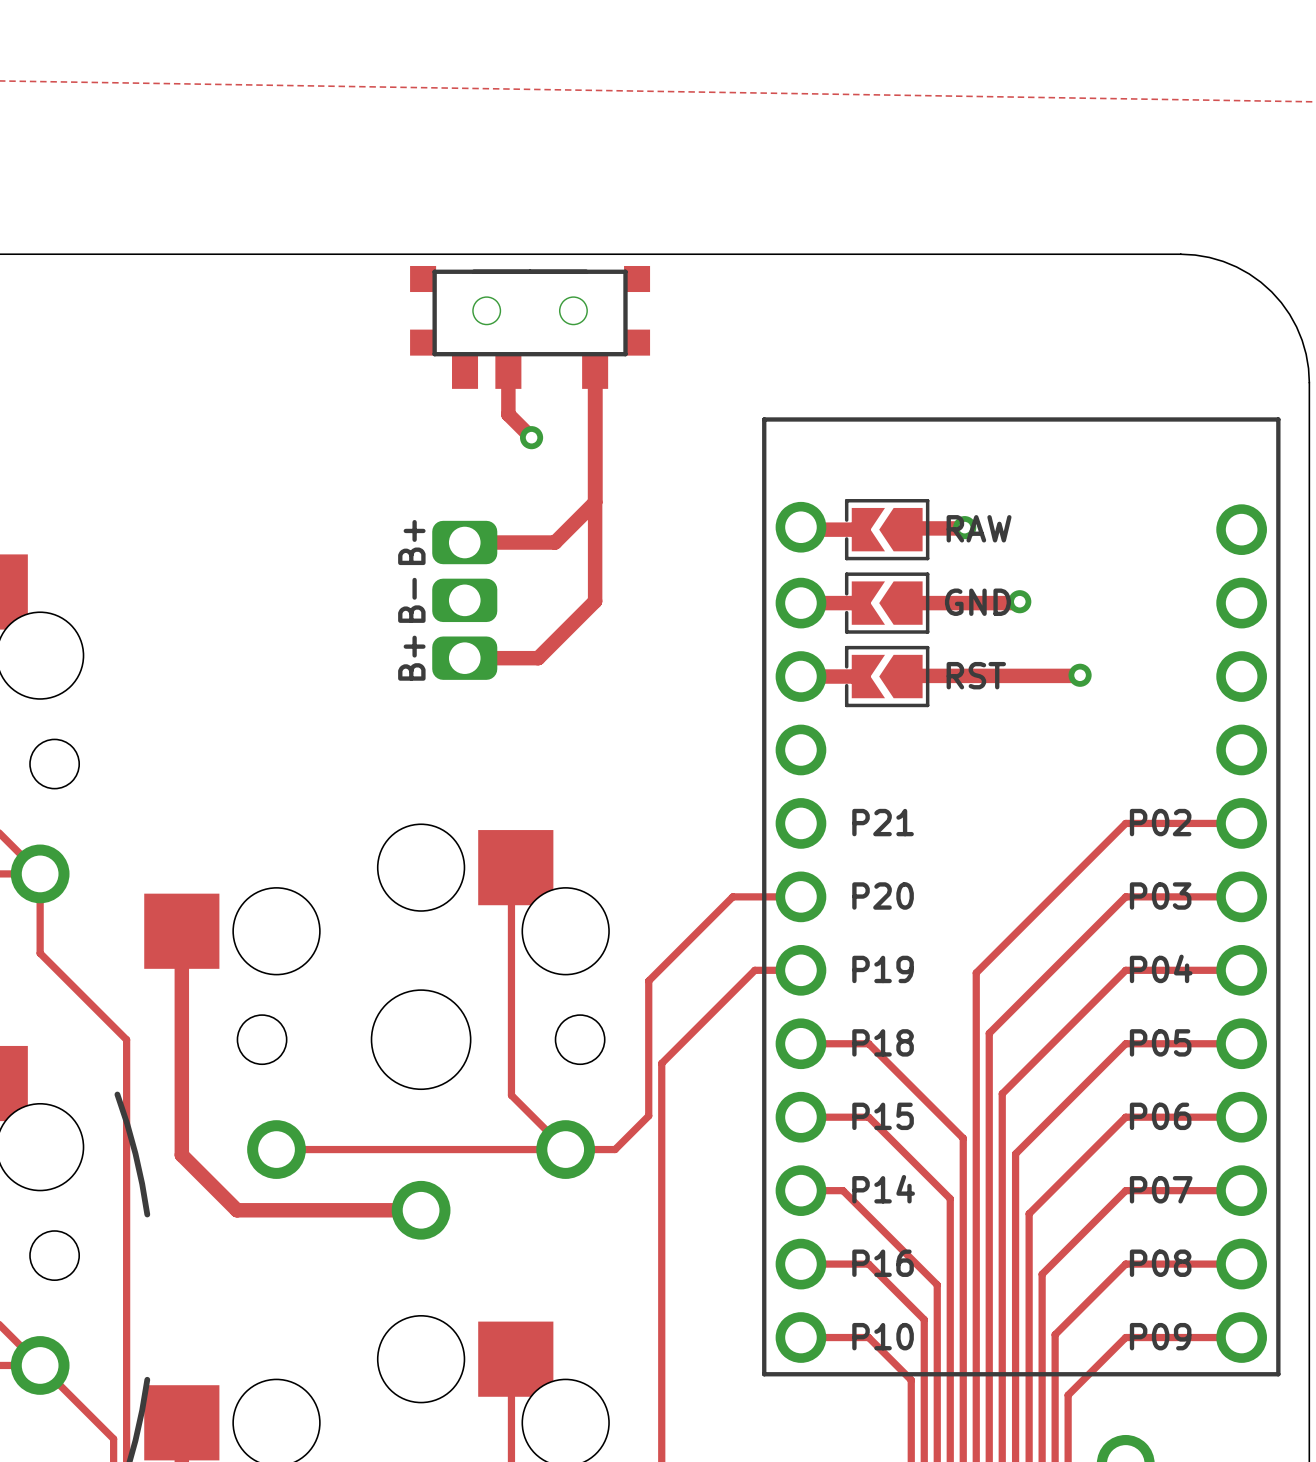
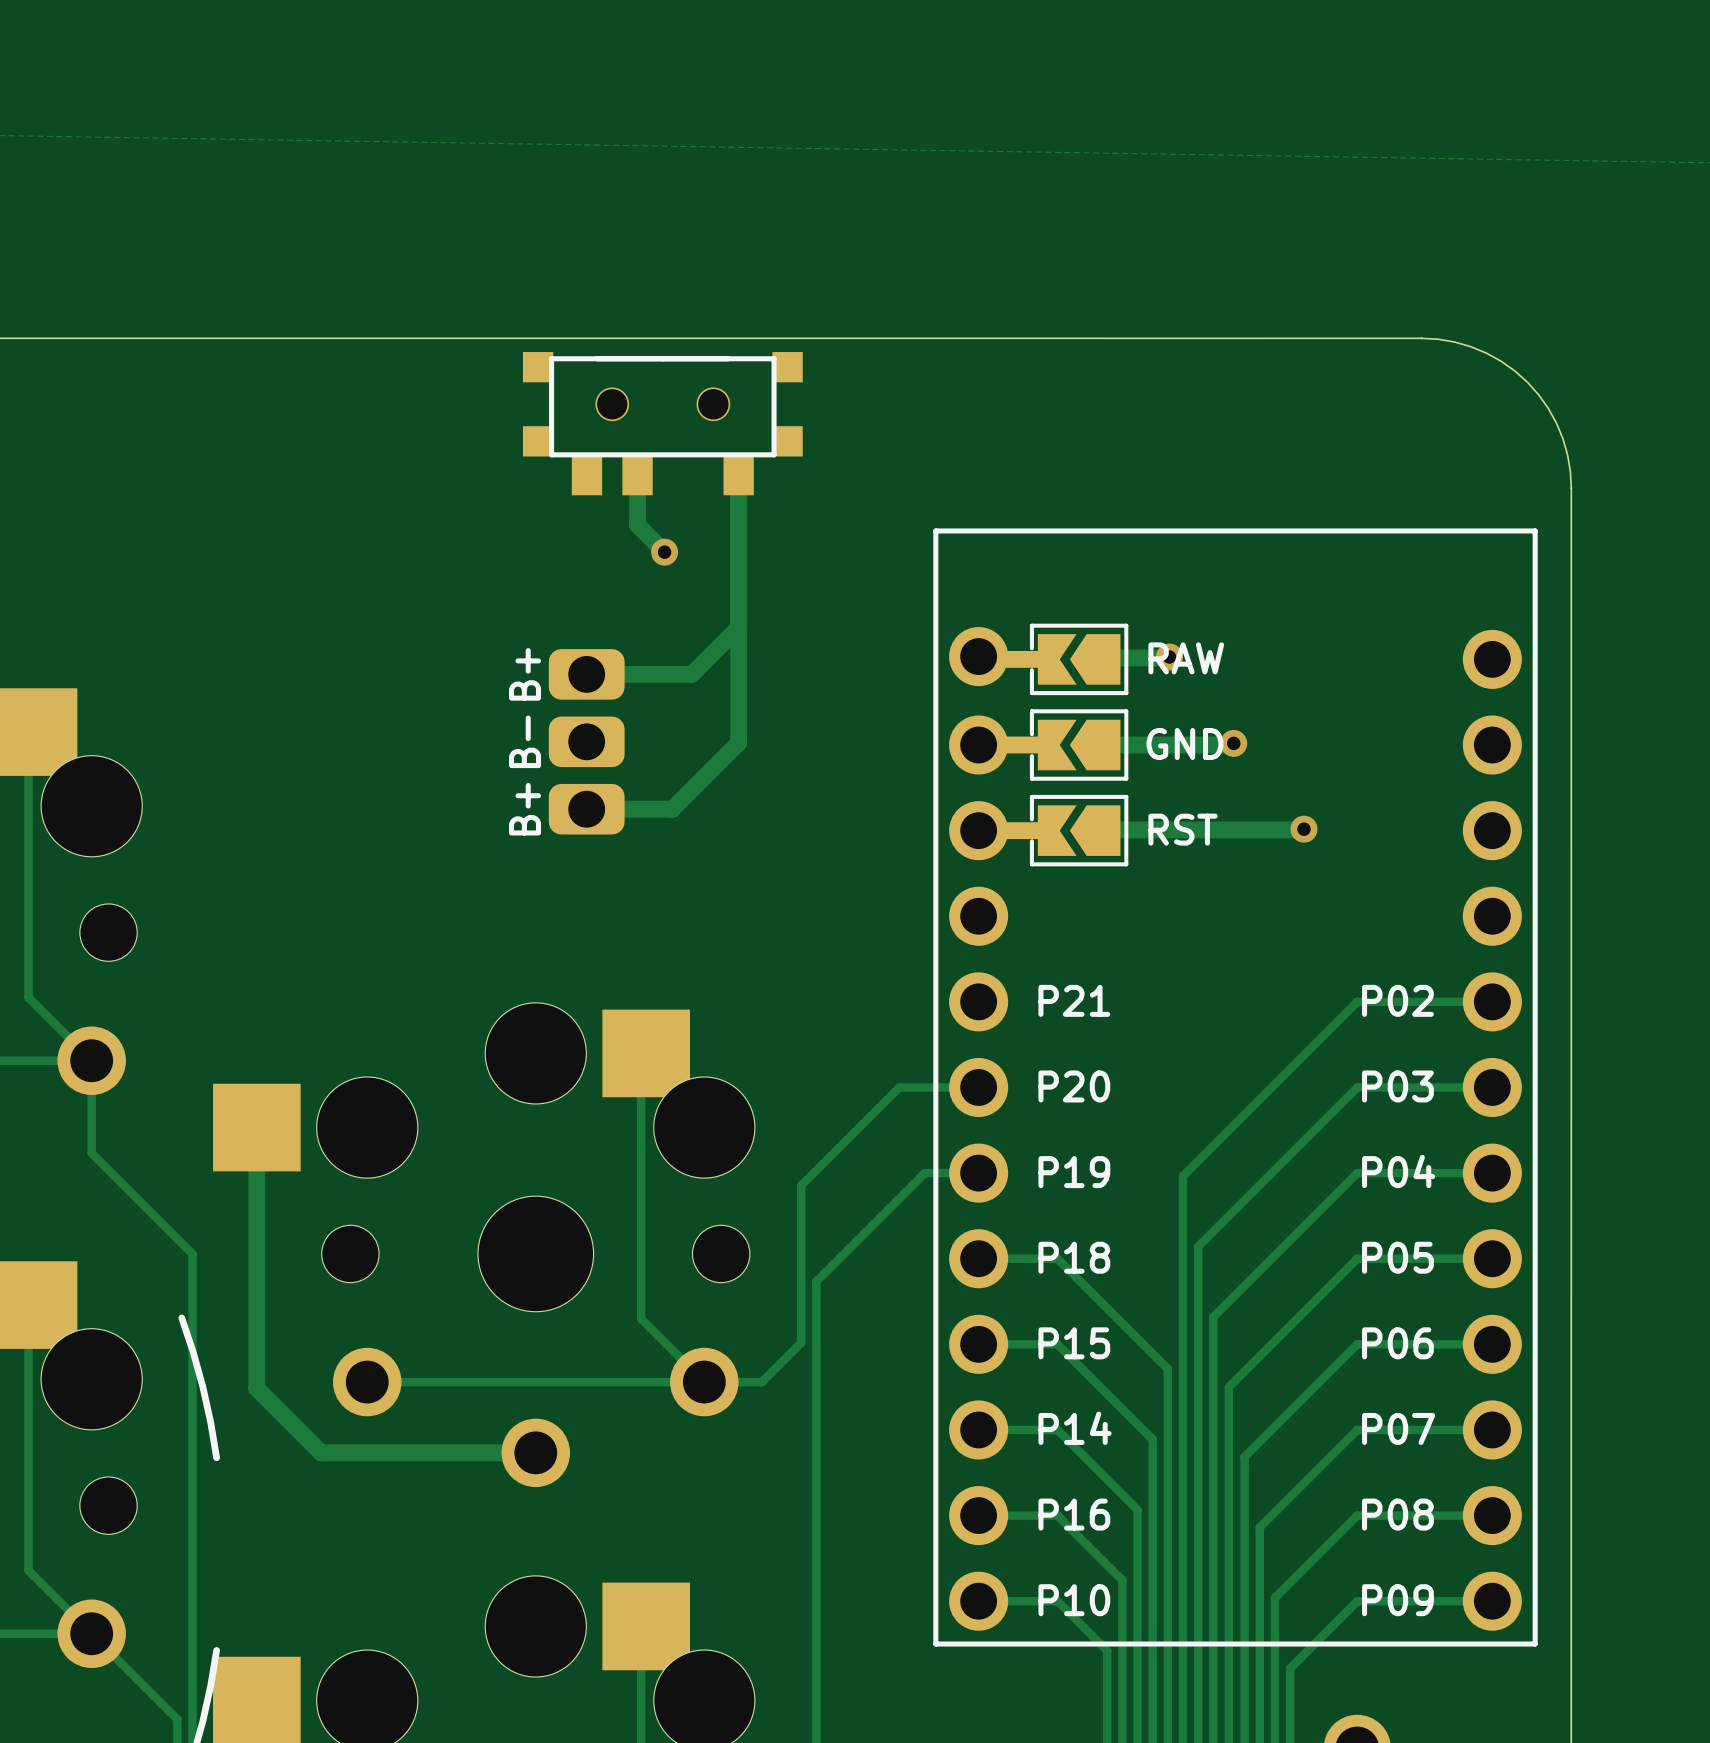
track: (842, 1190) (937, 1284) -> (1027, 1429) (1057, 1429) (1137, 1509) (1137, 1539)

